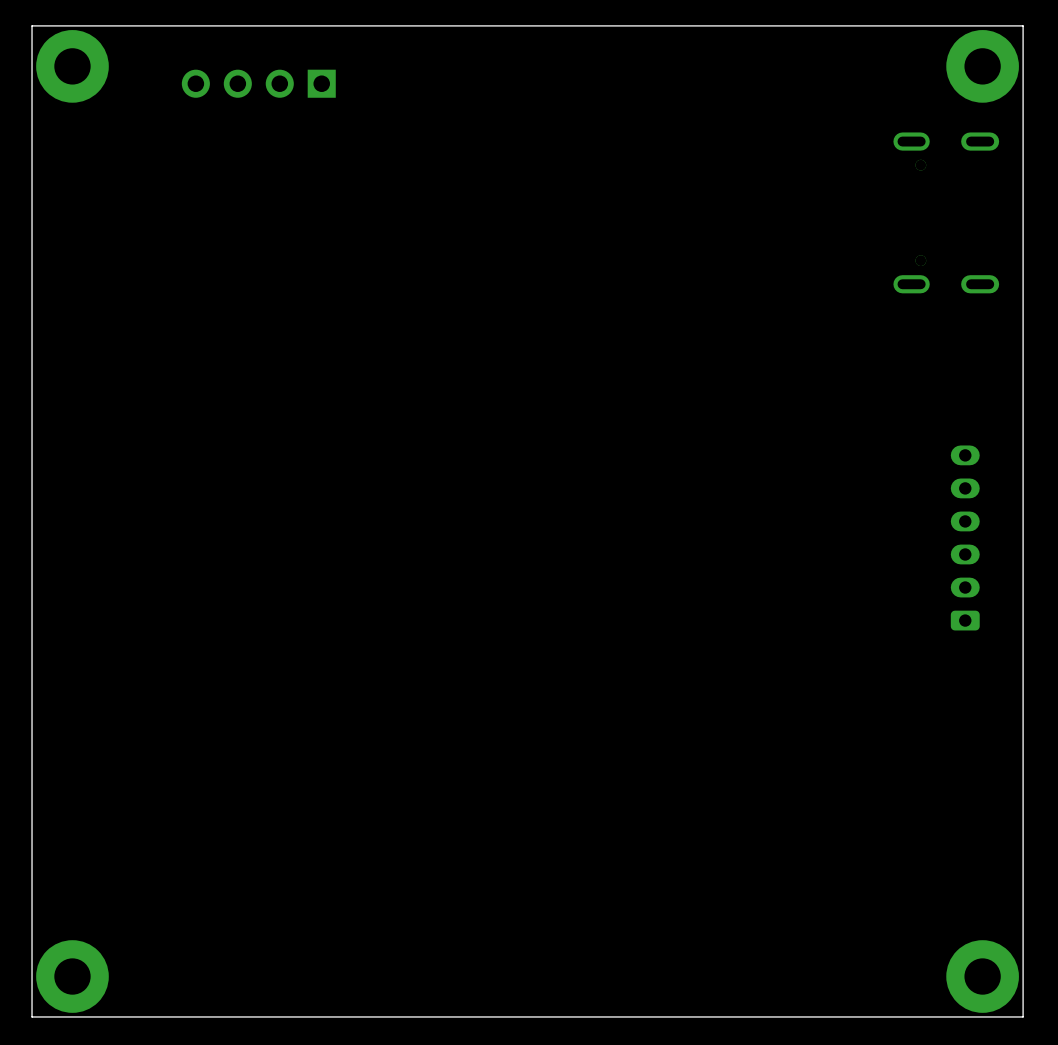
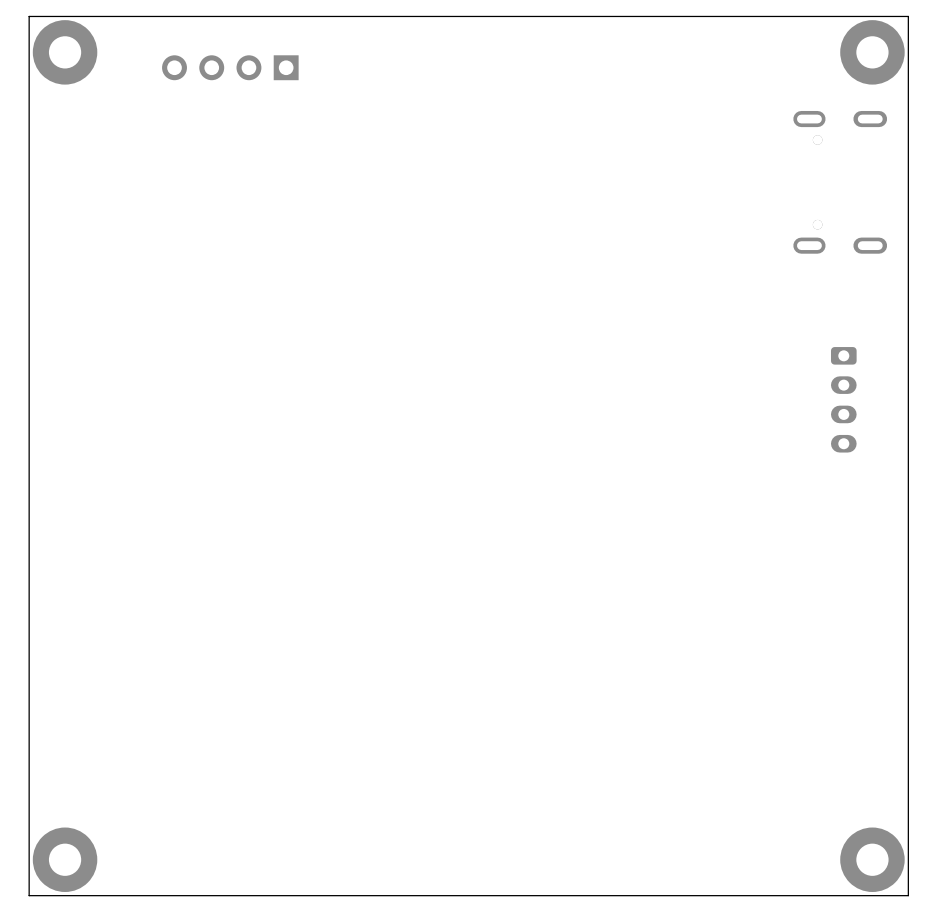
part: none -> (843, 399)
part: (965, 537) -> none

